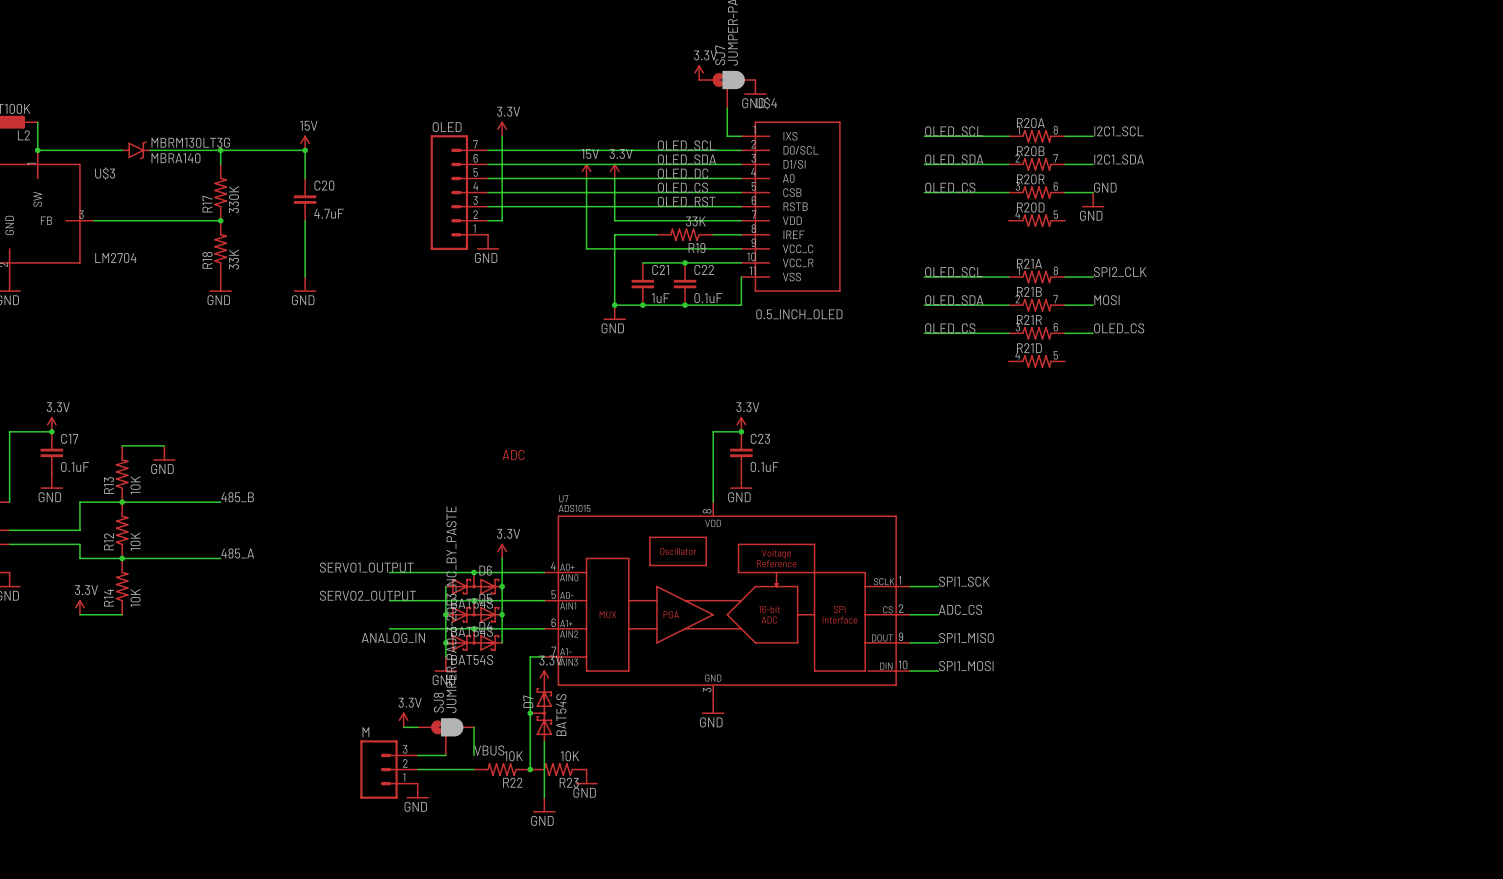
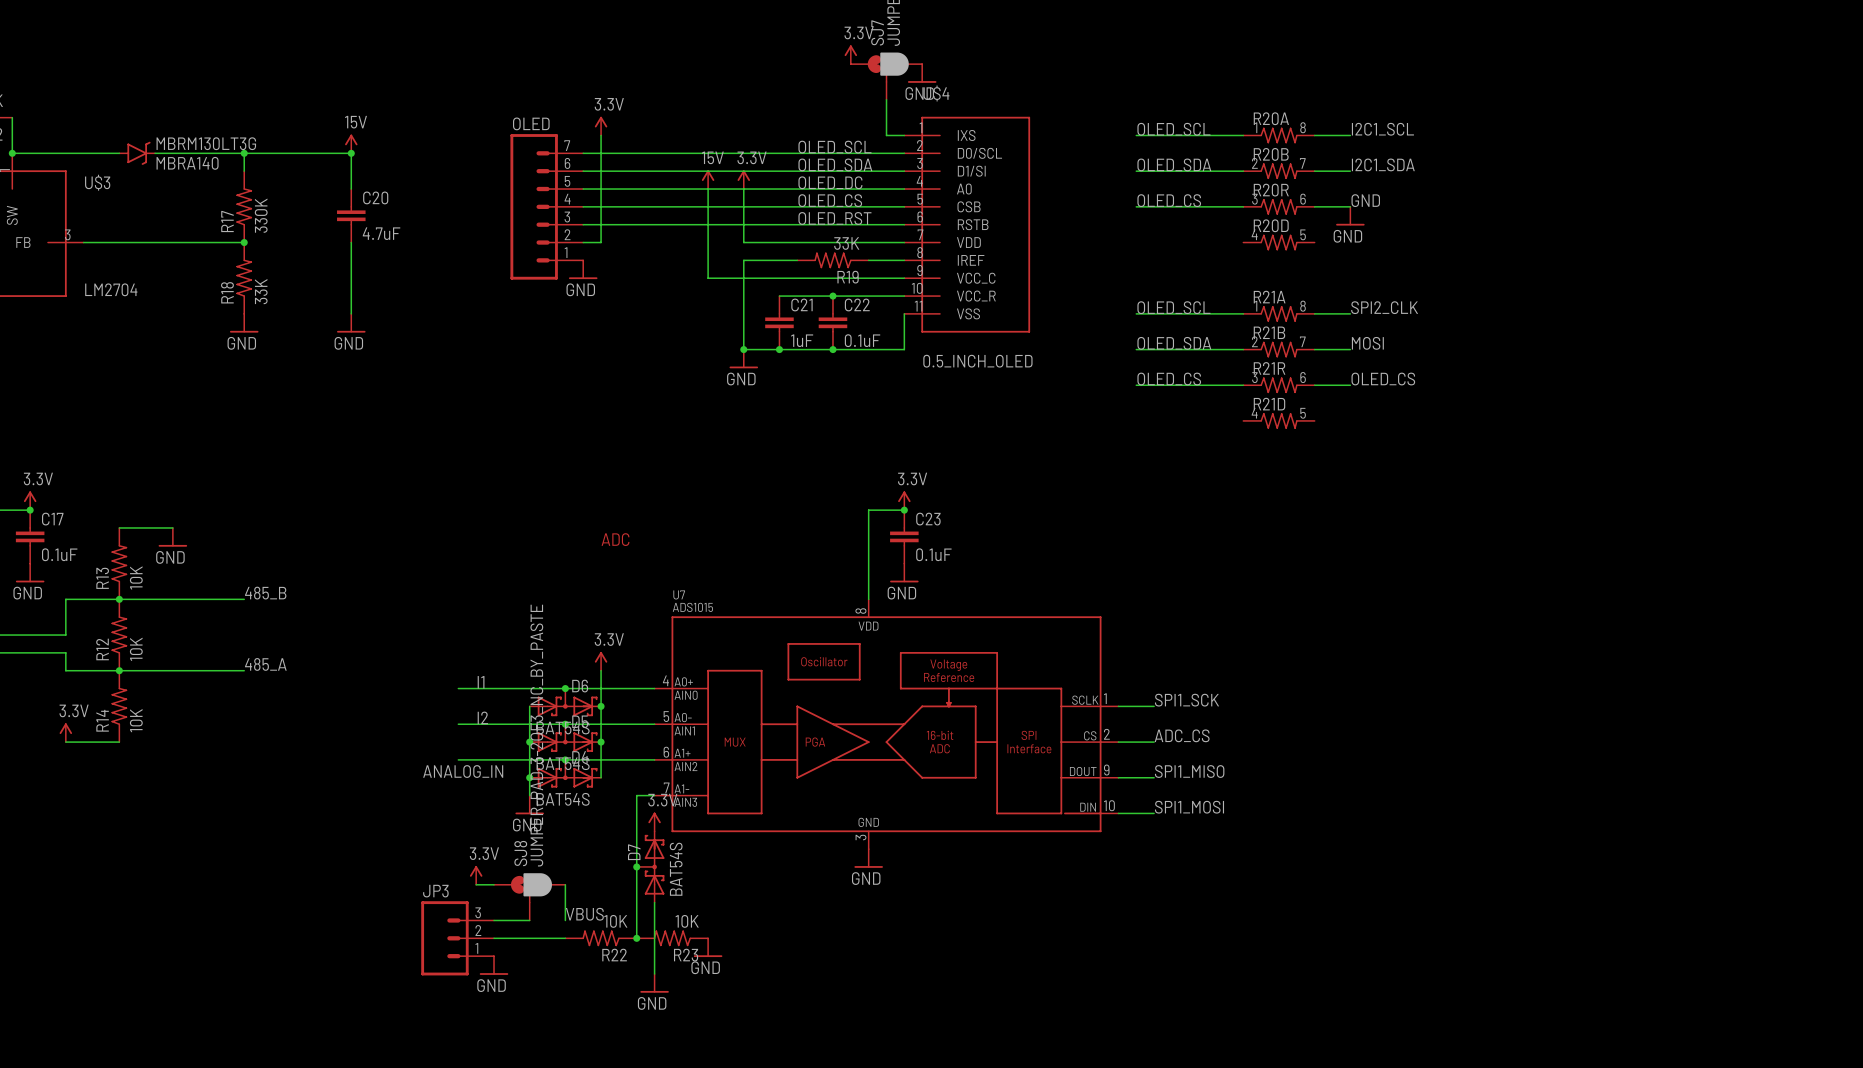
label: SERVO1_OUTPUT (366, 567) -> none
label: none -> I1 (481, 682)
label: SERVO2_OUTPUT (367, 595) -> none
label: none -> I2 (482, 717)
M name: M (365, 732) -> JP3 (435, 891)

